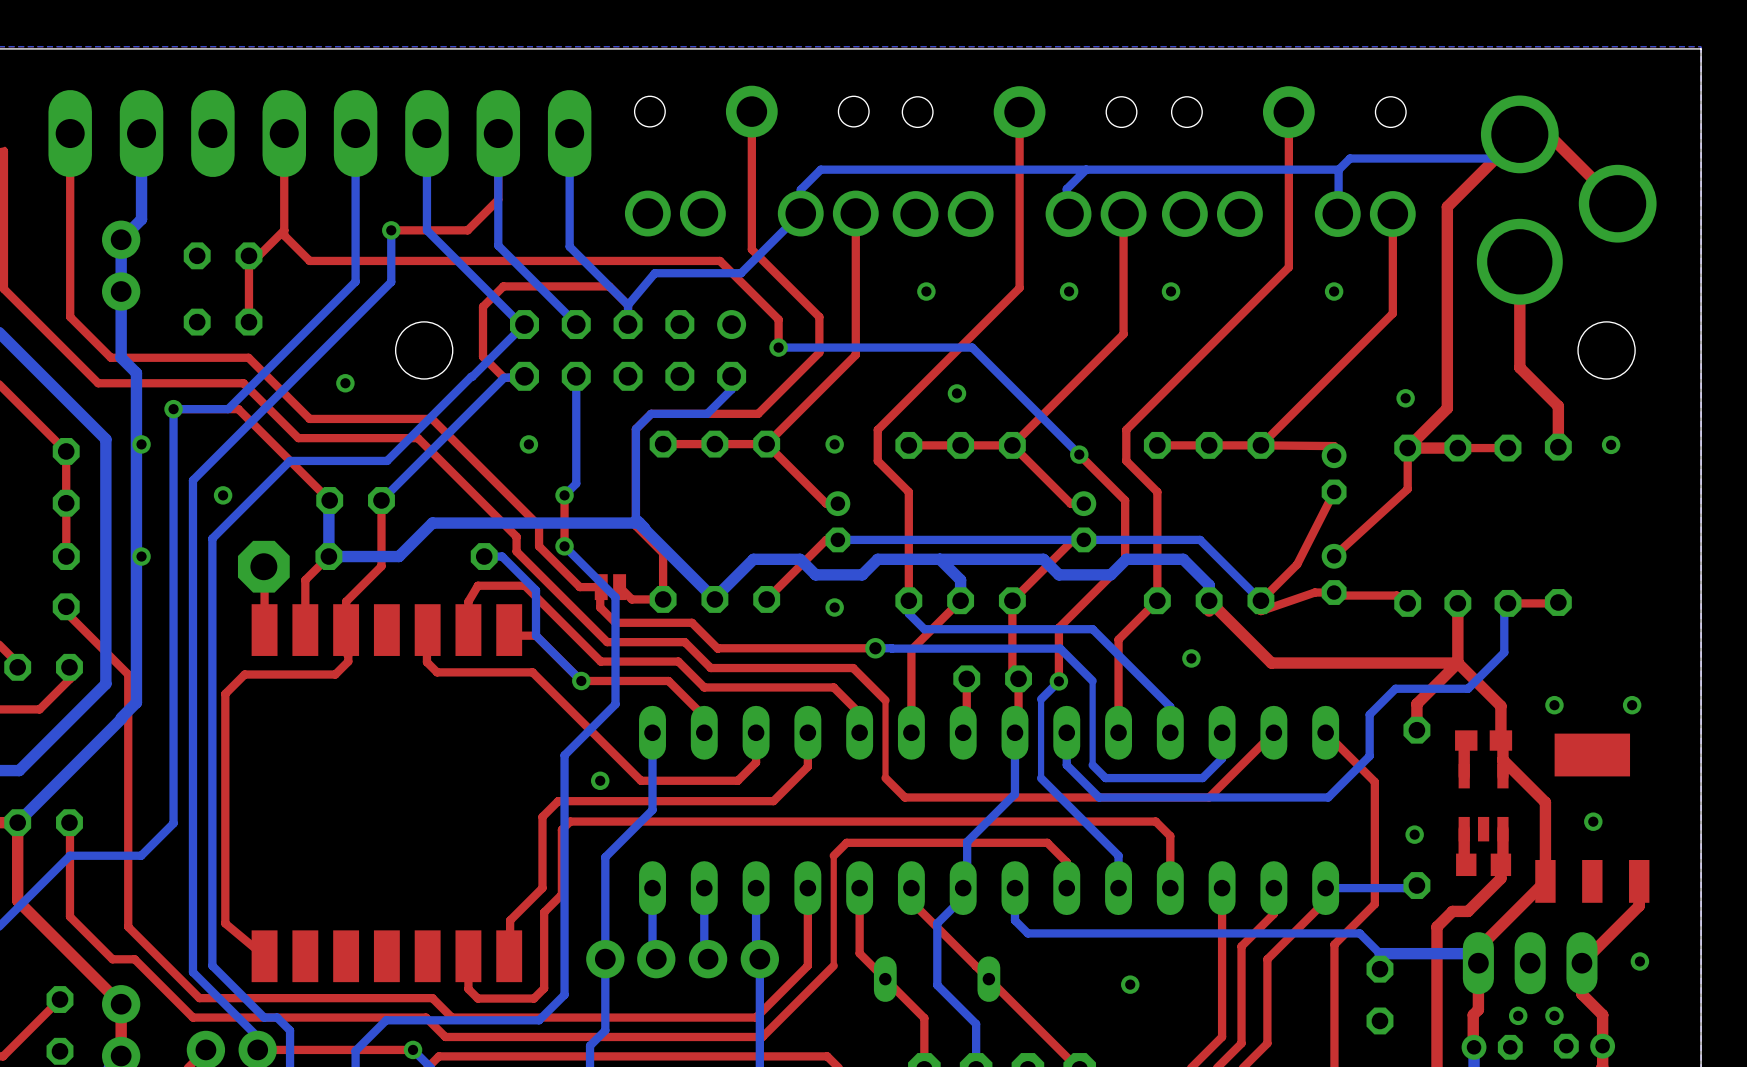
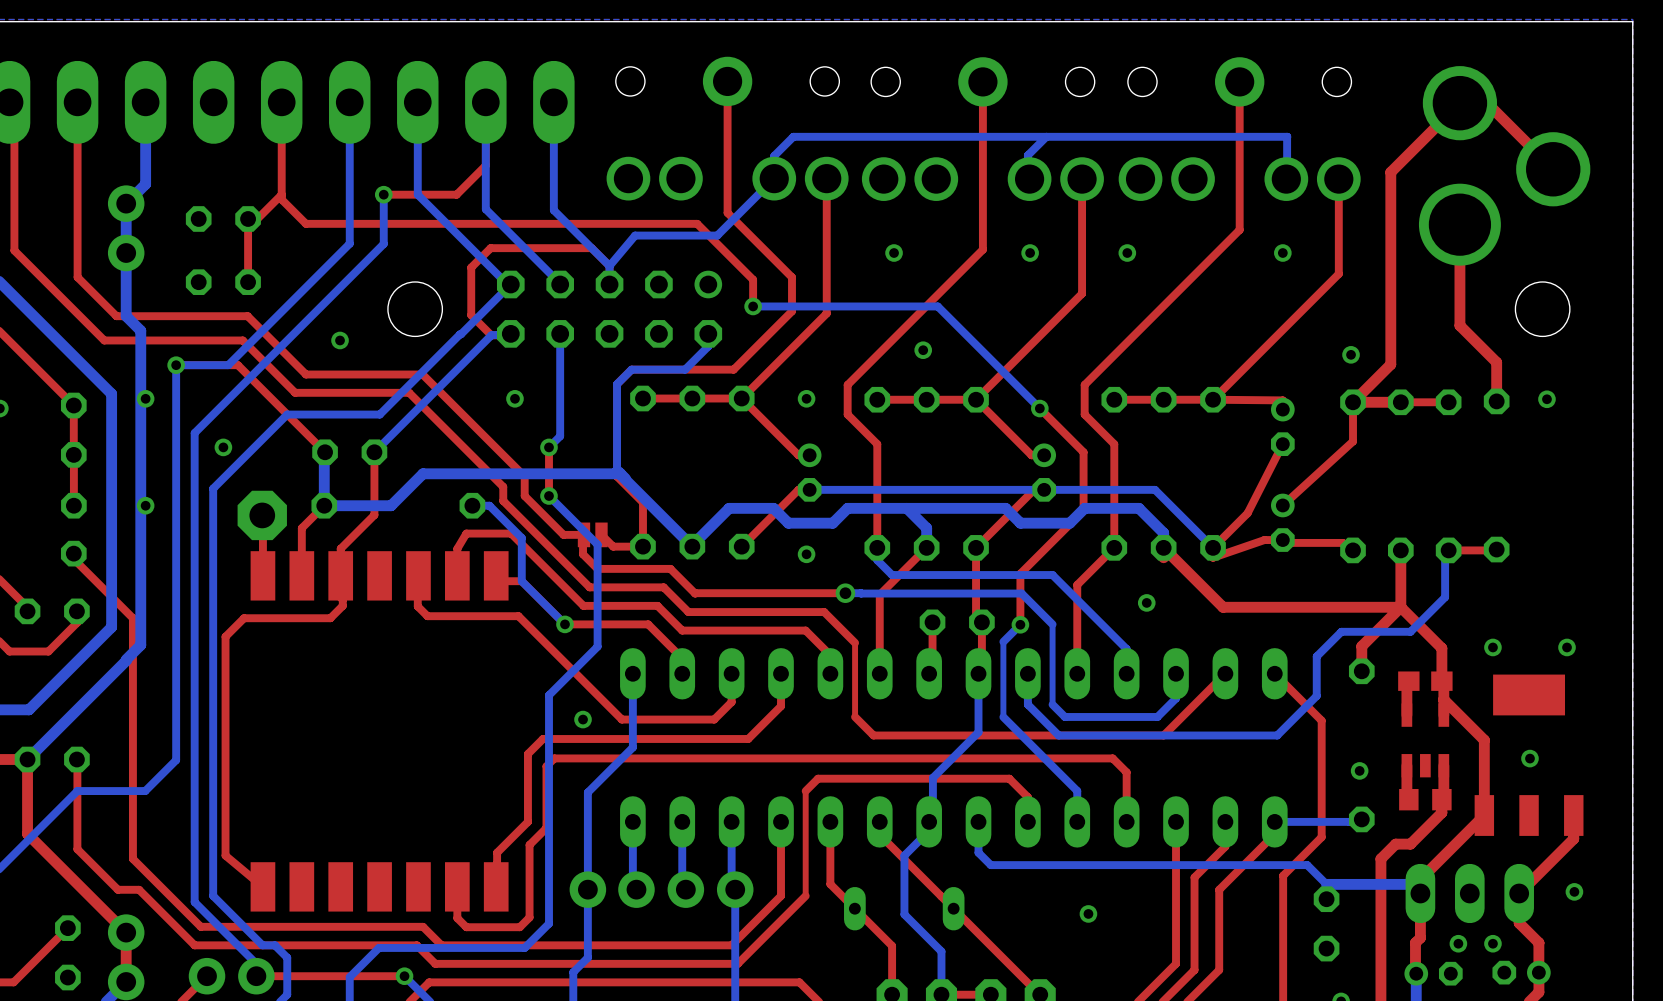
bottom track: (1495, 158) (1349, 158) (1338, 169) -> none

